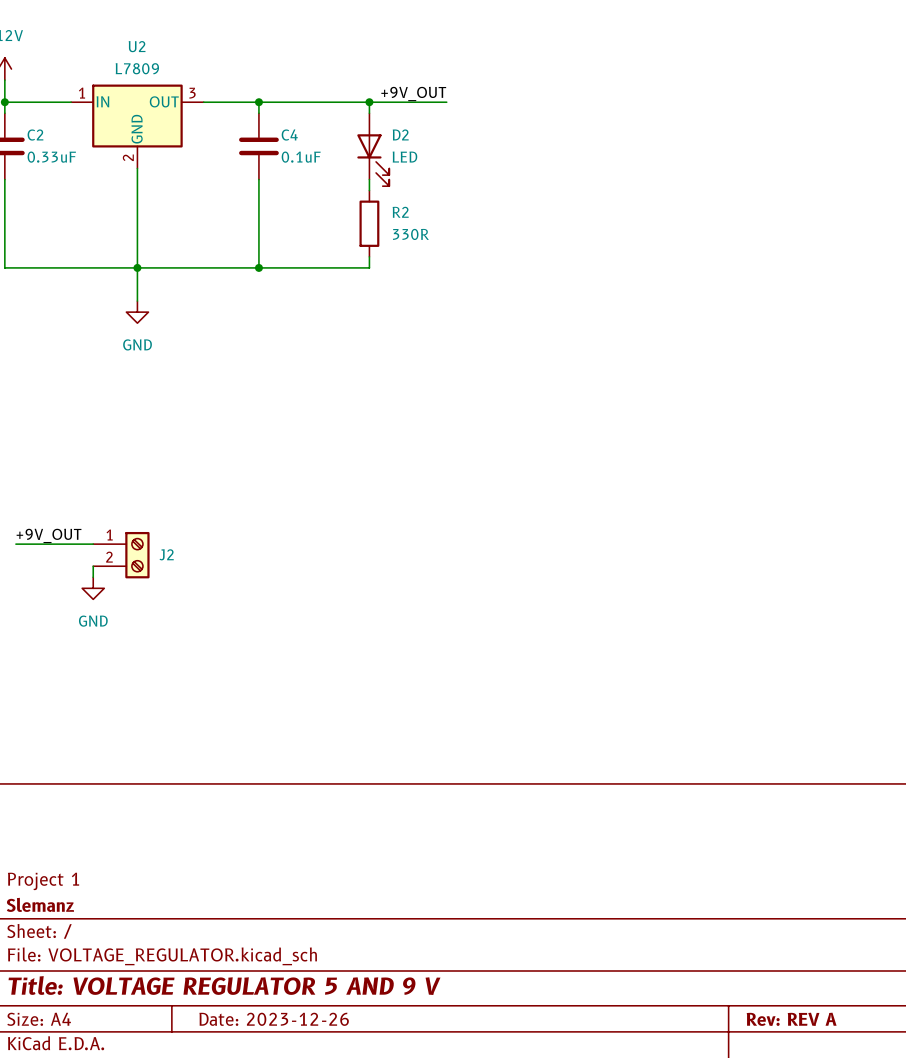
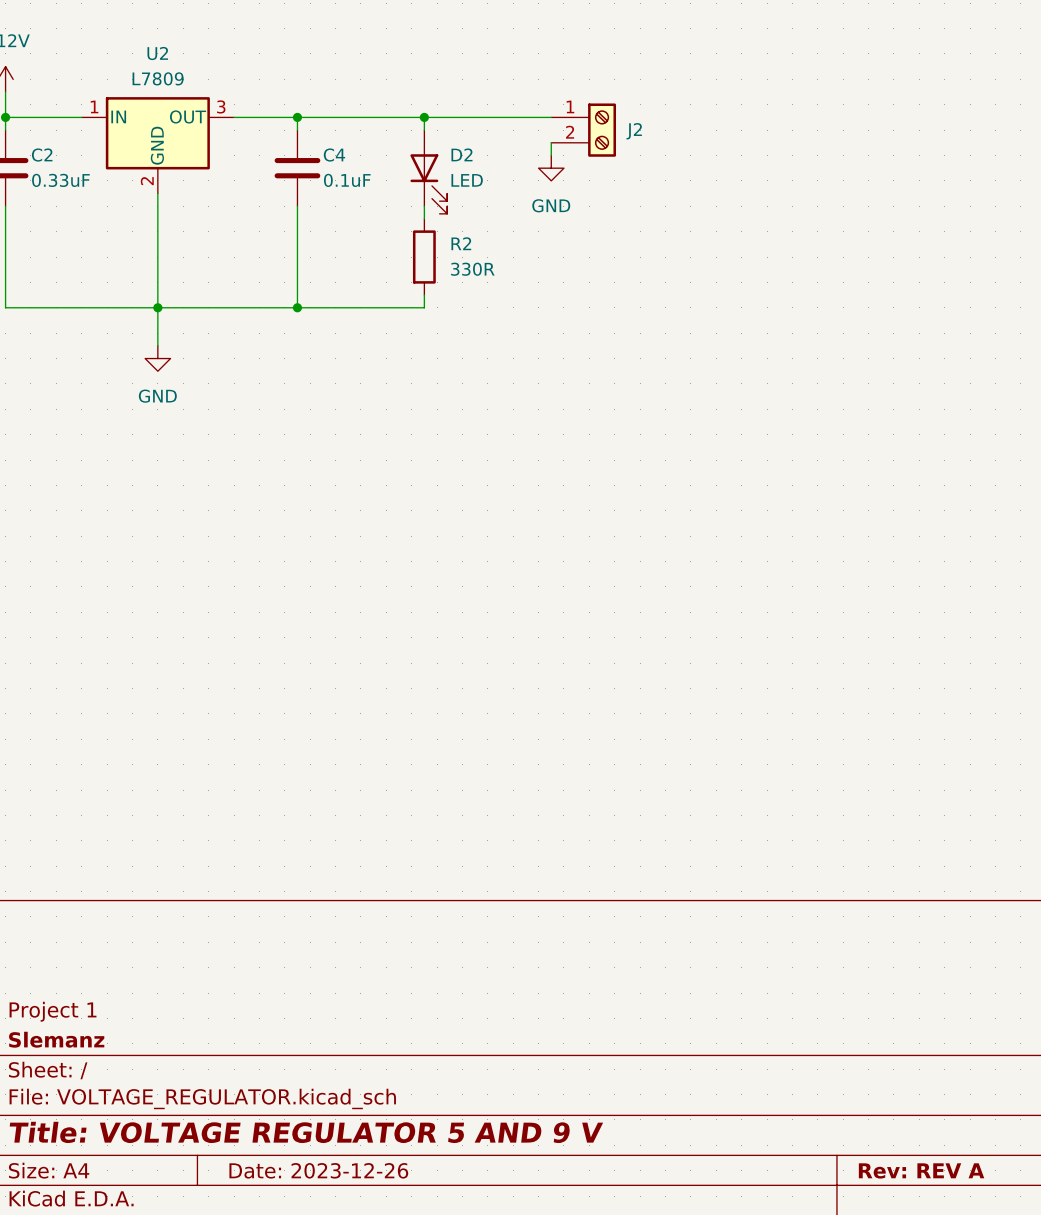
label: +9V_OUT (413, 94) -> none
wire: none -> (513, 117) (551, 117)
wire: none -> (551, 142) (551, 155)
power symbol: none -> GND (551, 168)
label: +9V_OUT (49, 535) -> none
wire: (15, 544) (93, 544) -> none
J2 position: (121, 555) -> (583, 130)
wire: (93, 566) (93, 577) -> none
power symbol: GND (93, 588) -> none

